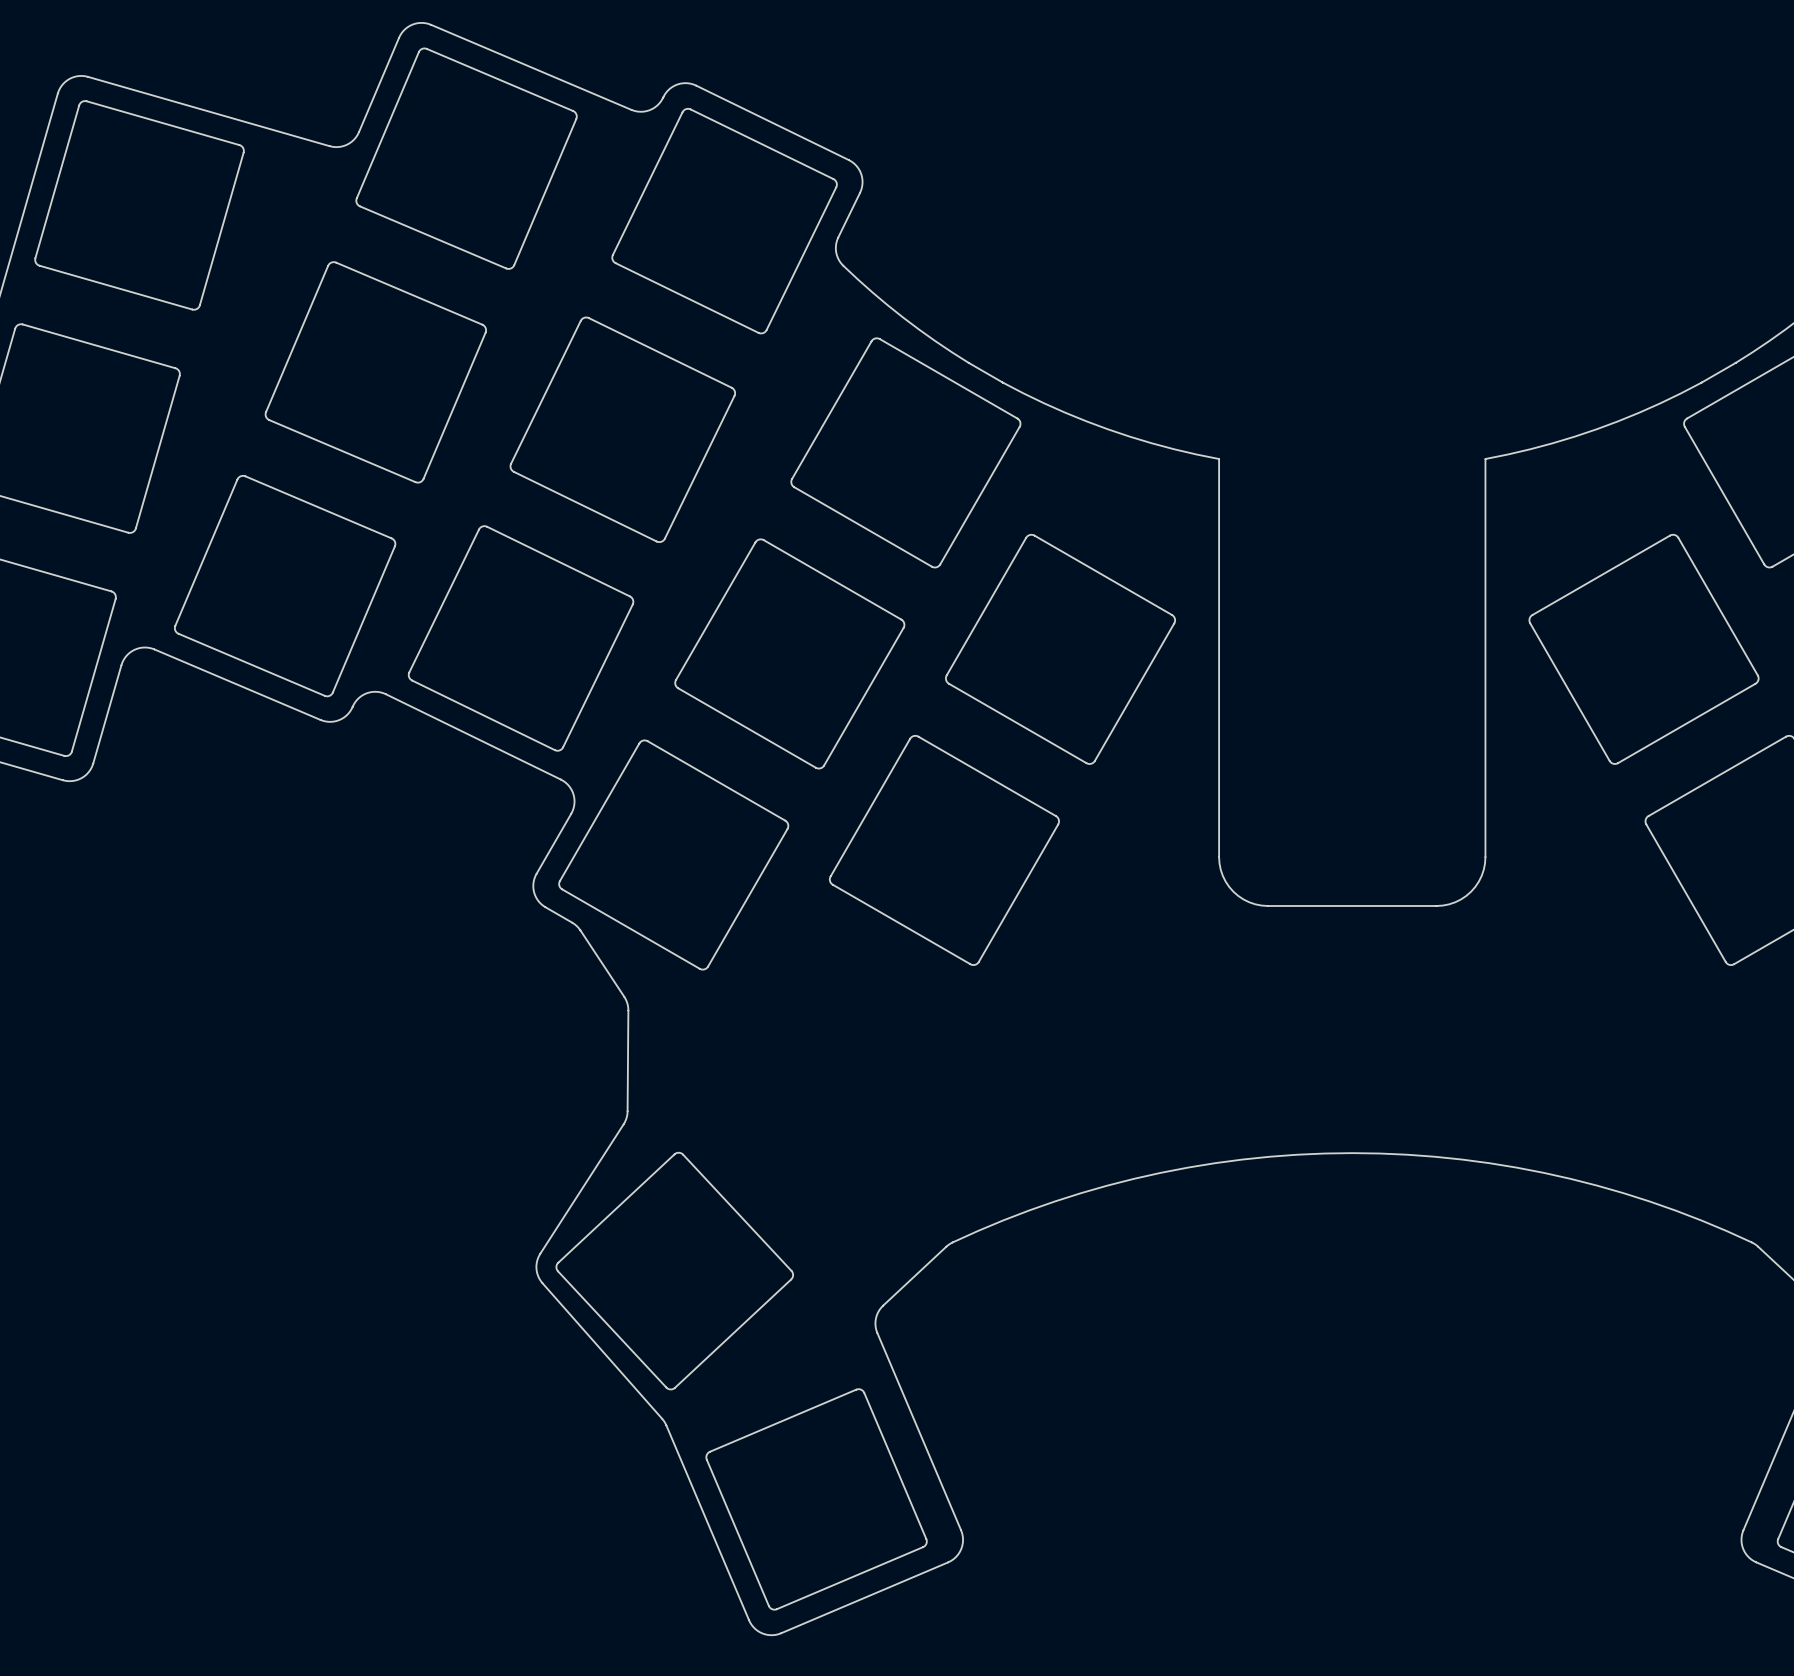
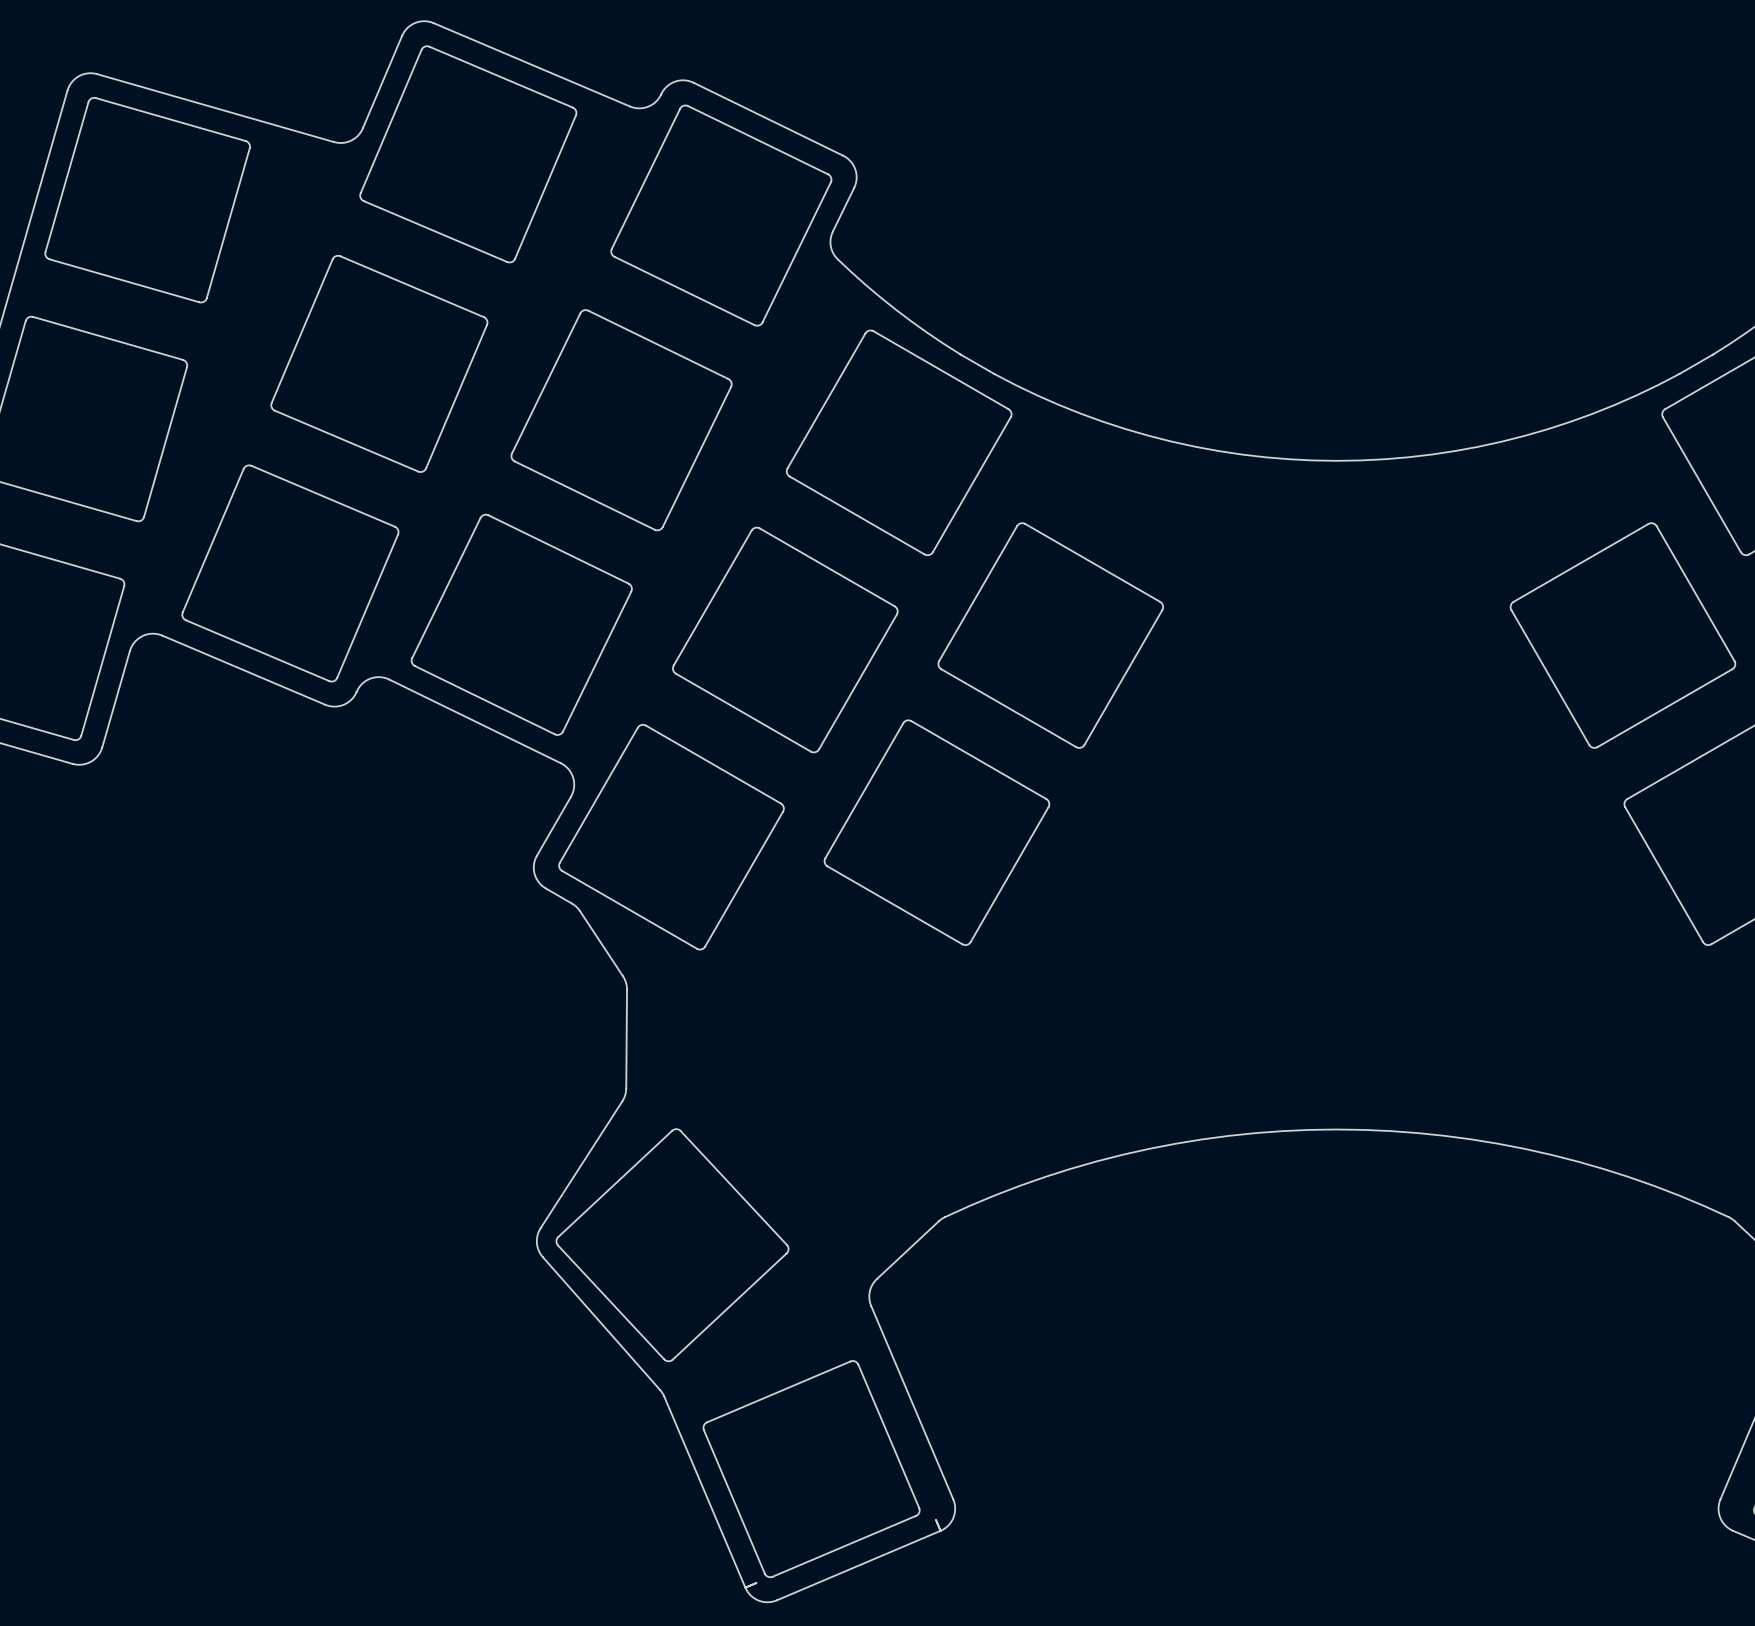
board edge: (1003, 382) (1044, 403) (1108, 429) (1174, 449) (1219, 459) (1219, 863) (1222, 875) (1233, 891) (1249, 902) (1267, 905) (1442, 905) (1461, 899) (1475, 886) (1481, 875) (1485, 857) (1485, 459) (1552, 443) (1596, 429) (1639, 412) (1701, 382) -> (994, 374) (1037, 395) (1080, 413) (1148, 435) (1195, 446) (1242, 454) (1289, 459) (1336, 460) (1384, 459) (1431, 454) (1478, 446) (1524, 435) (1570, 421) (1614, 404) (1679, 374)
board edge: none -> (940, 1530) (935, 1519) (940, 1530)
board edge: none -> (745, 1587) (756, 1582) (745, 1587)

